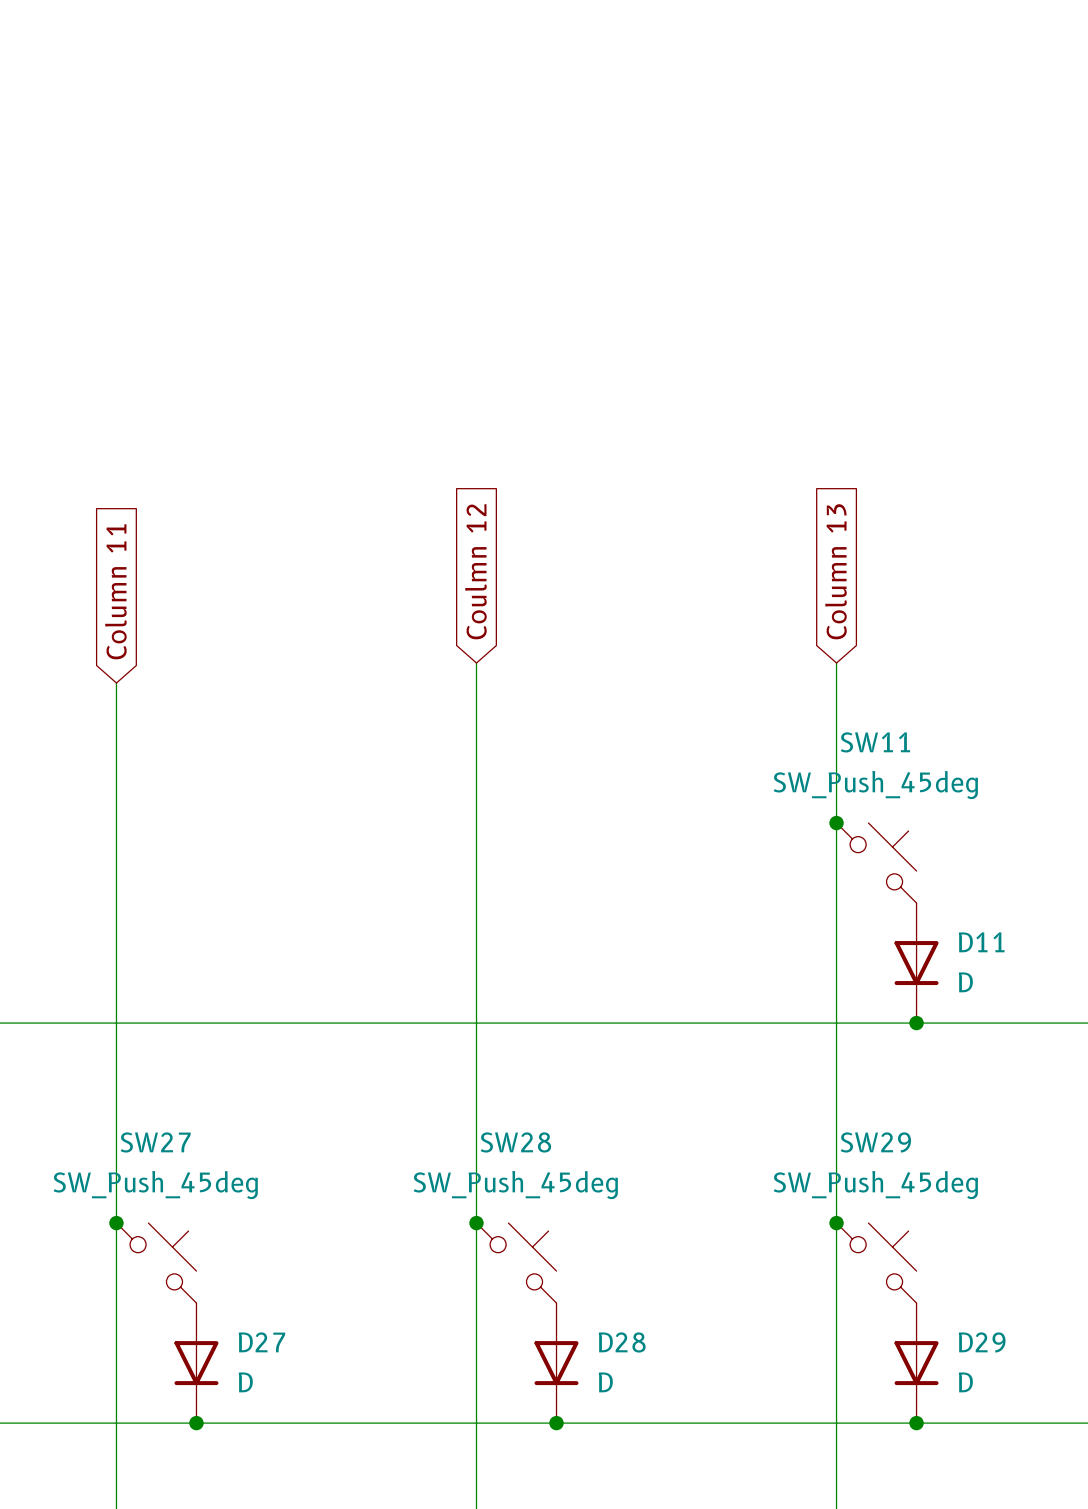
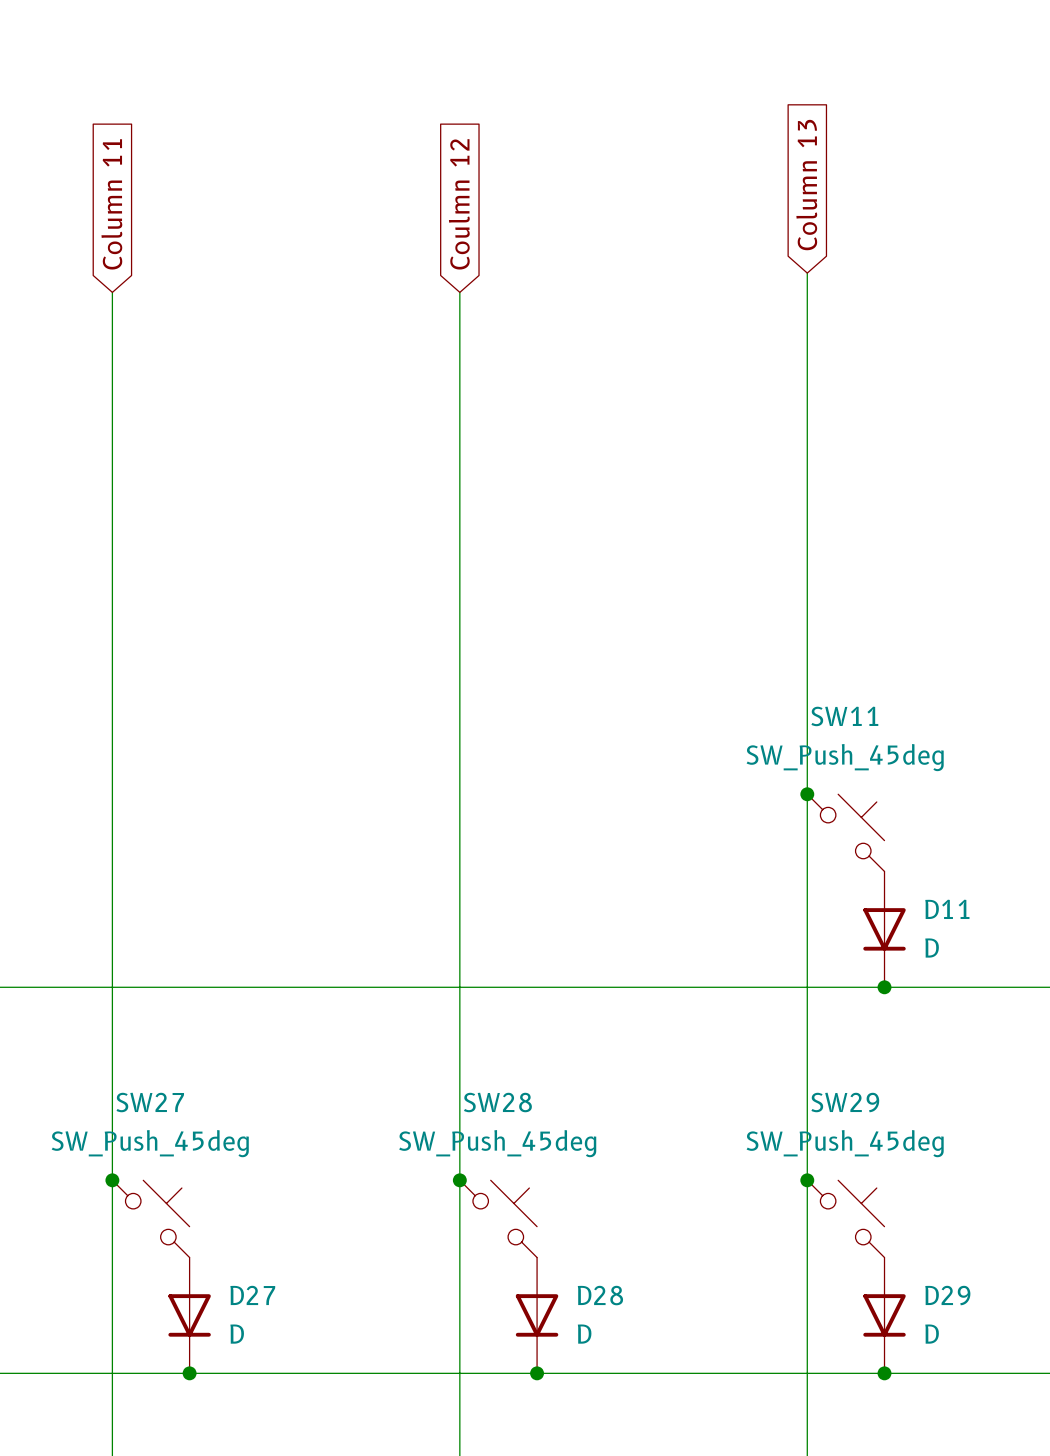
wire: none -> (807, 273) (807, 639)
wire: none -> (112, 292) (112, 659)
wire: none -> (459, 292) (459, 639)
global label position: Coulmn 12 (475, 571) -> Coulmn 12 (459, 204)
global label position: Column 13 (835, 571) -> Column 13 (806, 185)
global label position: Column 11 (115, 591) -> Column 11 (111, 204)

